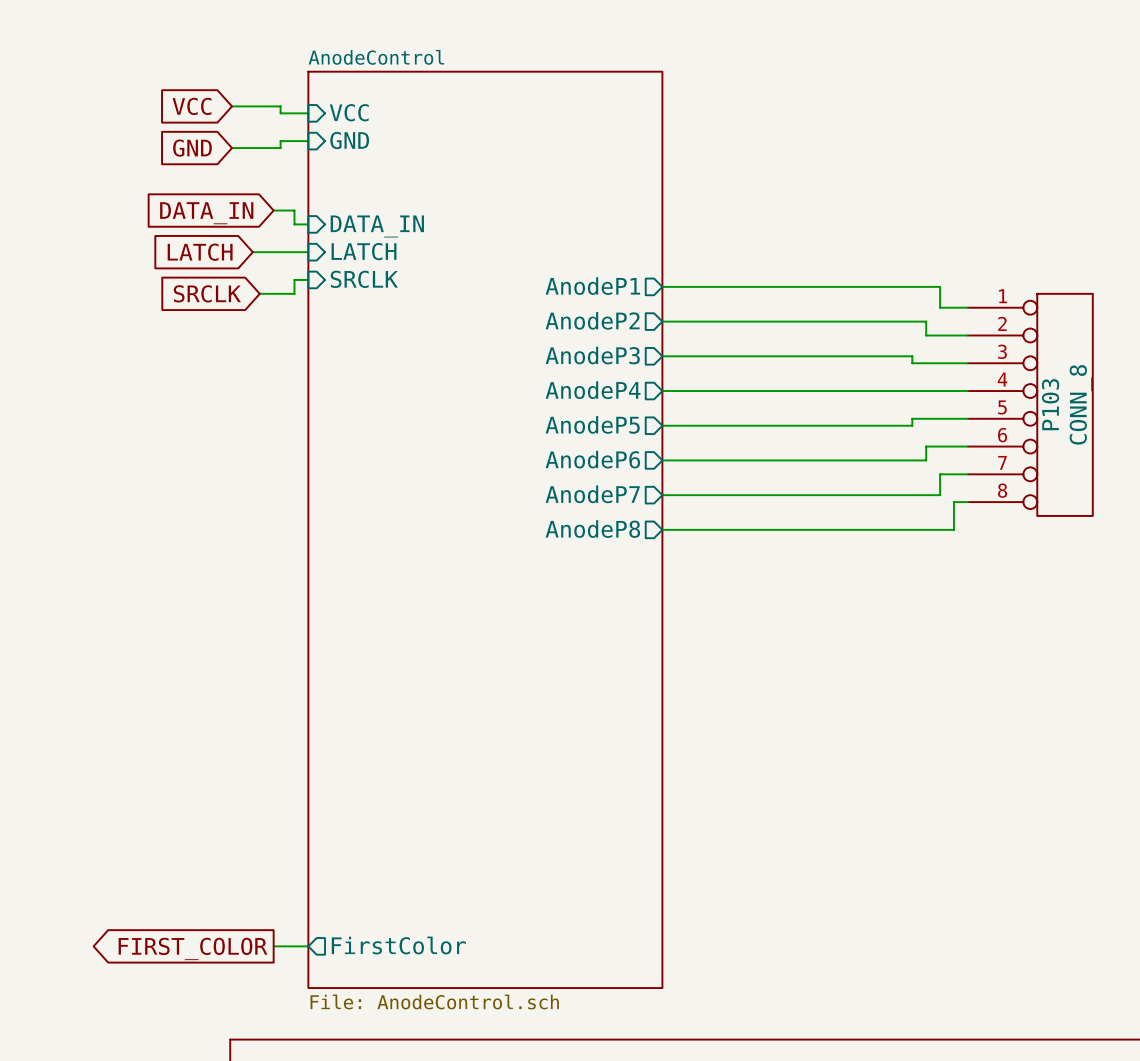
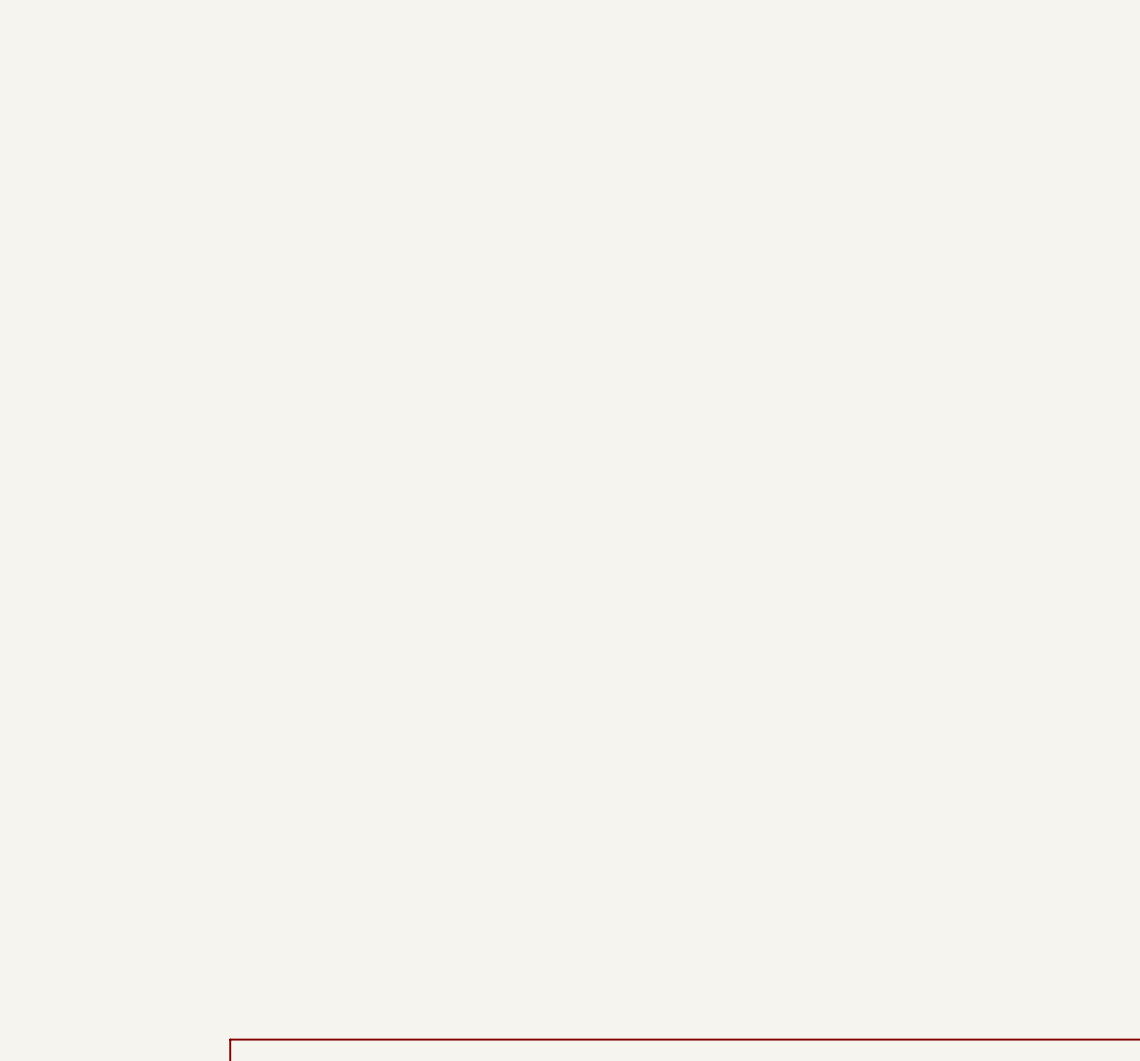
global label: VCC (192, 106) -> none
wire: (232, 106) (280, 106) (280, 113) (308, 113) -> none
sheet pin: VCC (349, 112) -> none
sheet pin: GND (349, 140) -> none
wire: (308, 141) (280, 141) (280, 148) (232, 148) -> none
global label: GND (192, 148) -> none
wire: (273, 210) (294, 210) (294, 224) (308, 224) -> none
global label: DATA_IN (206, 213) -> none
sheet pin: DATA_IN (377, 226) -> none
sheet pin: LATCH (364, 251) -> none
global label: LATCH (200, 252) -> none
wire: (252, 252) (308, 252) -> none
wire: (308, 279) (294, 279) (294, 293) (259, 293) -> none
sheet pin: SRCLK (364, 279) -> none
sheet pin: AnodeP1 (592, 286) -> none
wire: (662, 286) (940, 286) (940, 307) (967, 307) -> none
global label: SRCLK (207, 293) -> none
sheet pin: AnodeP2 (592, 320) -> none
wire: (662, 321) (926, 321) (926, 335) (967, 335) -> none
sheet pin: AnodeP3 (592, 355) -> none
wire: (662, 356) (912, 356) (912, 363) (967, 363) -> none
sheet pin: AnodeP4 (593, 390) -> none
wire: (662, 391) (967, 391) -> none
P103: CONN_8 (1030, 404) -> none
wire: (967, 418) (912, 418) (912, 425) (662, 425) -> none
sheet pin: AnodeP5 (592, 424) -> none
wire: (967, 446) (926, 446) (926, 460) (662, 460) -> none
sheet pin: AnodeP6 (592, 459) -> none
wire: (967, 474) (940, 474) (940, 495) (662, 495) -> none
sheet pin: AnodeP7 (592, 494) -> none
wire: (967, 502) (953, 502) (953, 529) (662, 529) -> none
sheet AnodeControl: File: AnodeControl.sch (485, 529) -> none
sheet pin: AnodeP8 (592, 529) -> none
sheet pin: FirstColor (398, 945) -> none
wire: (273, 946) (308, 946) -> none
global label: FIRST_COLOR (193, 948) -> none

